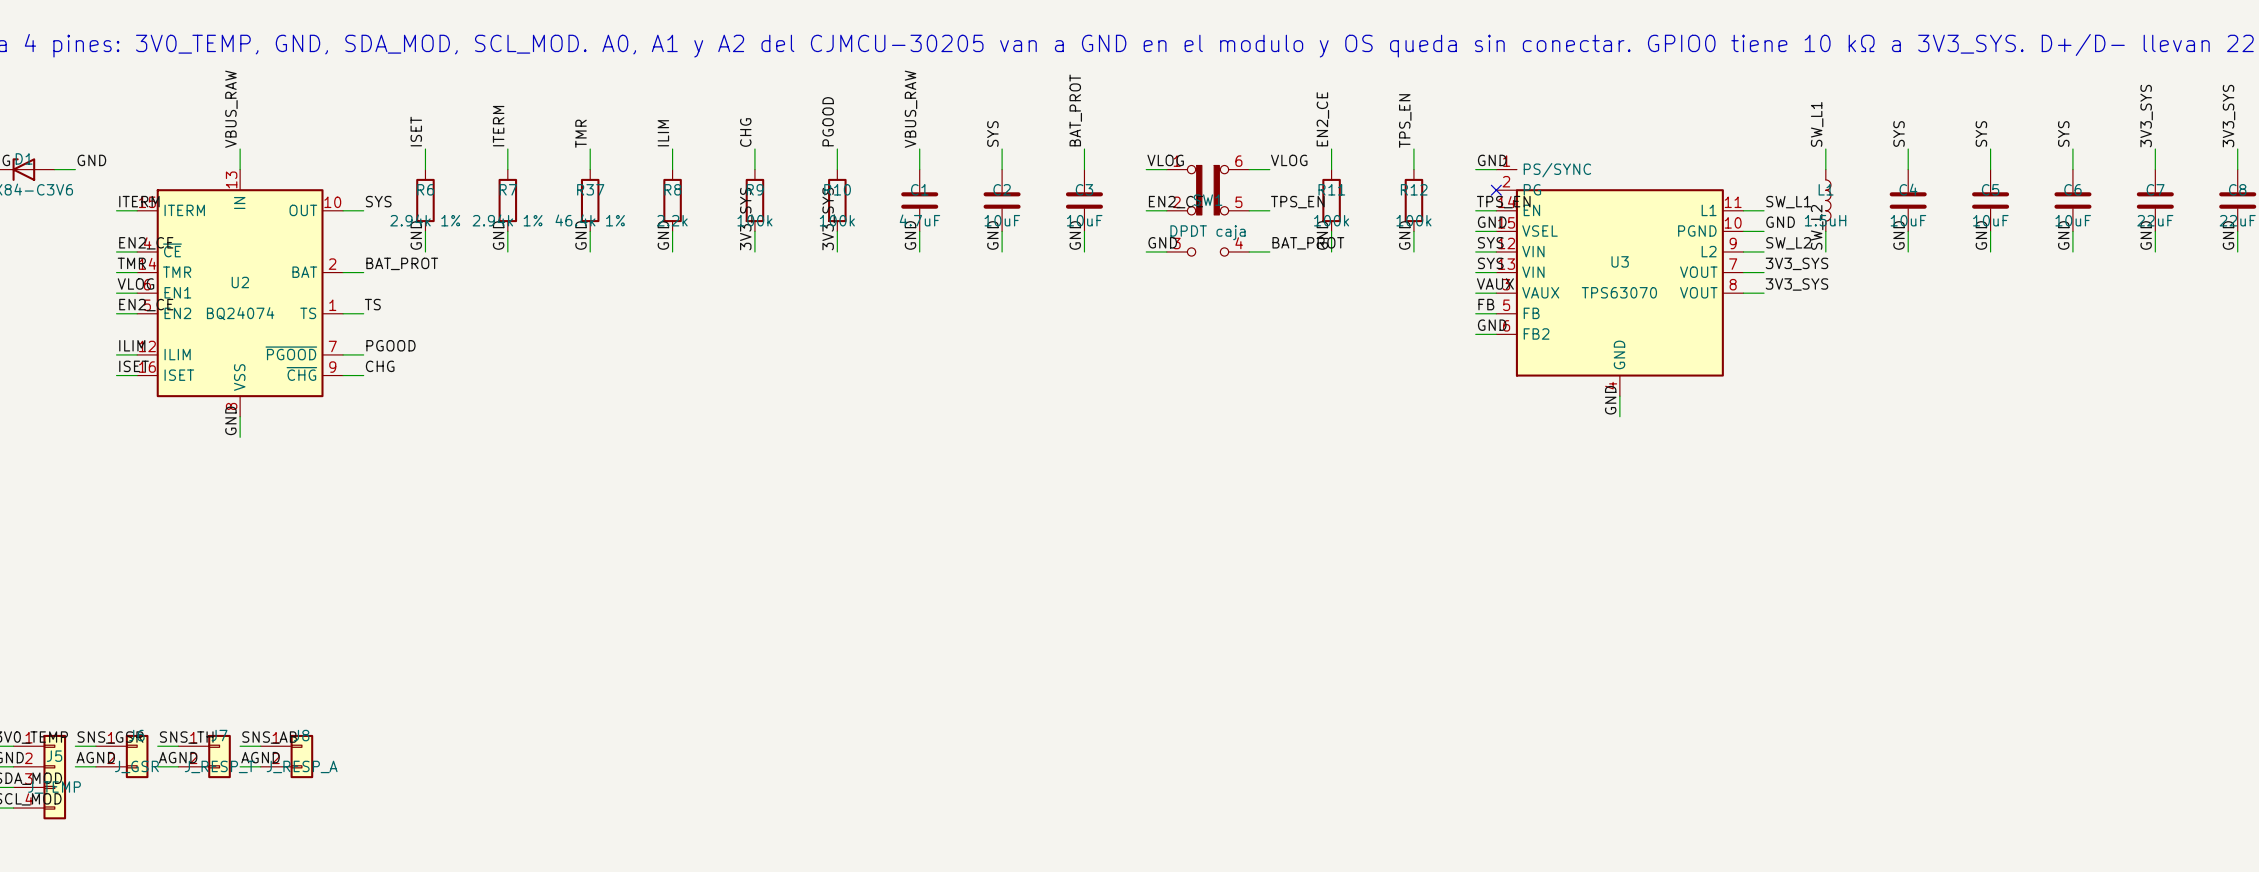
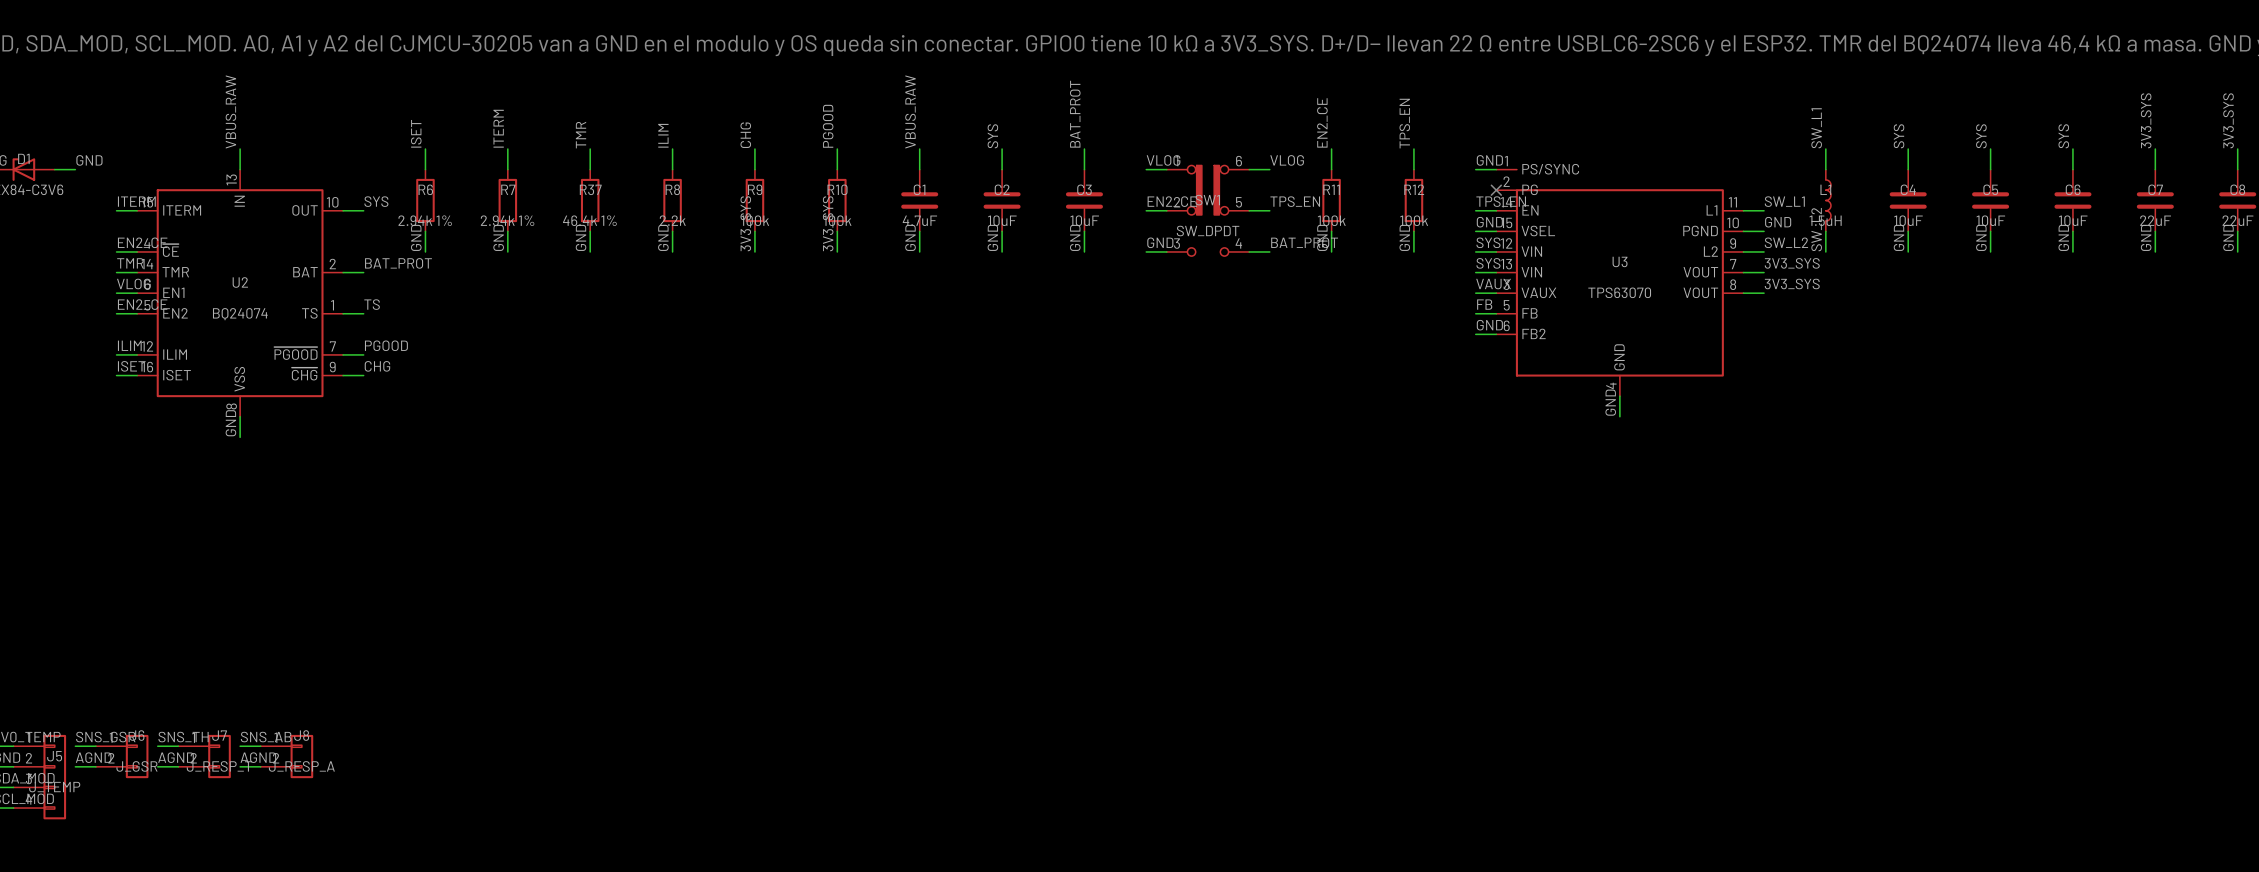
SW1 value: DPDT caja (1208, 232) -> SW_DPDT (1208, 231)

